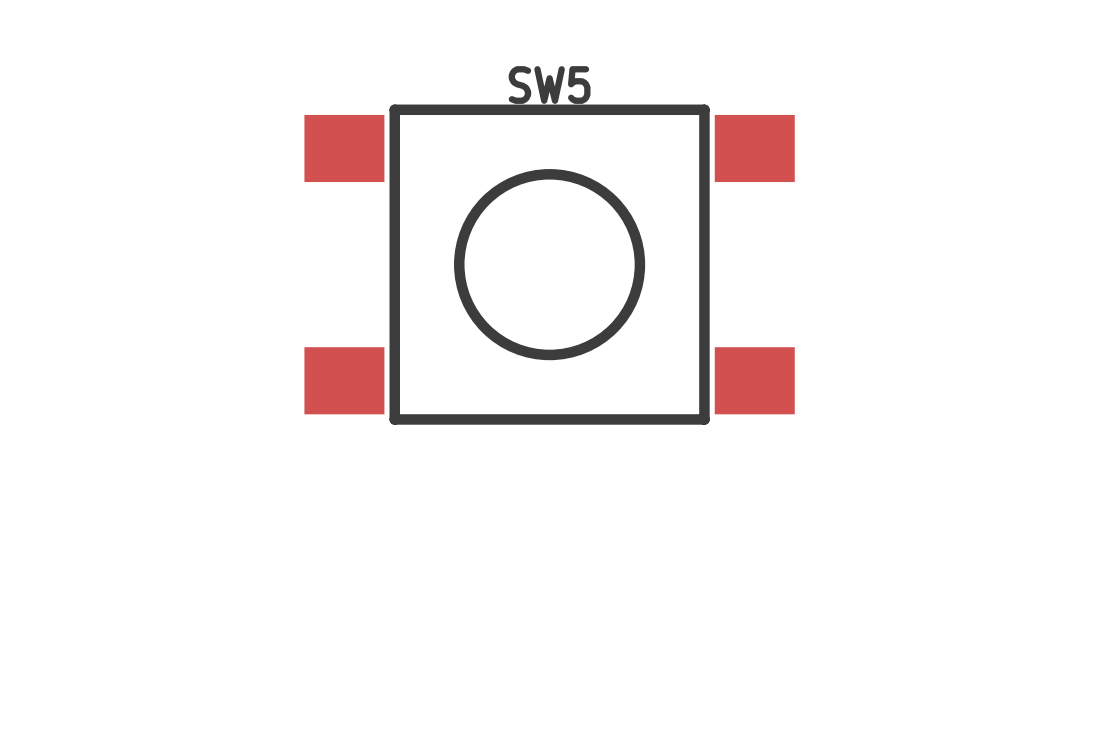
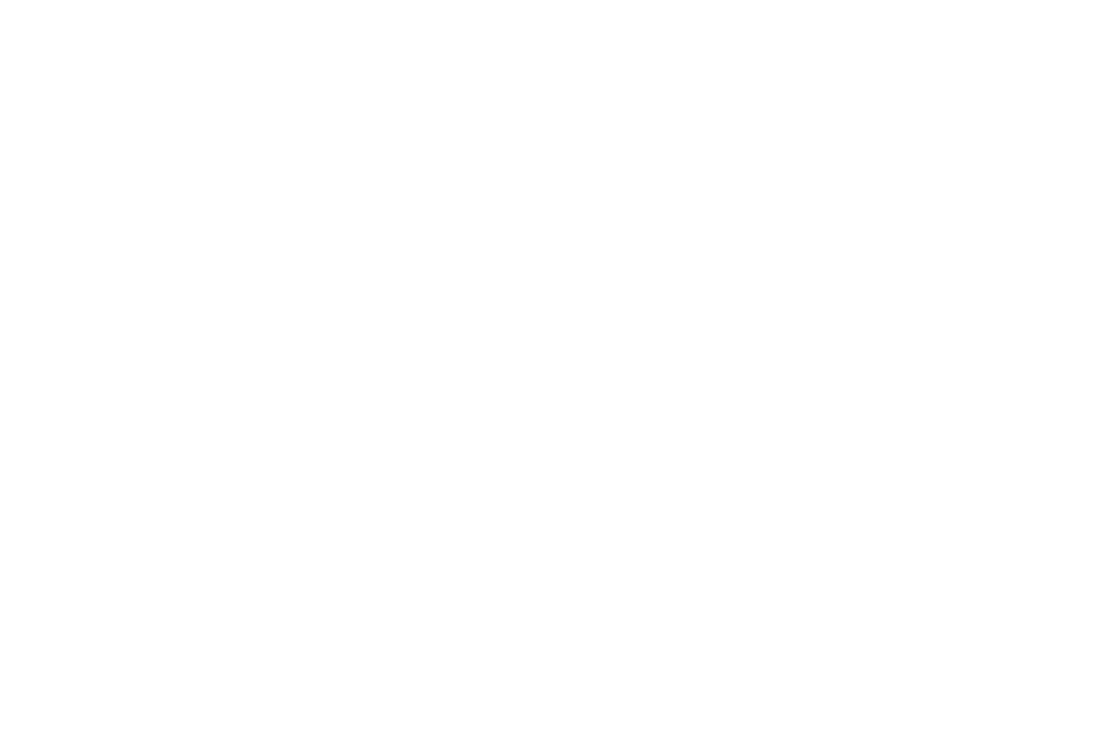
SW5: (549, 264) -> none

